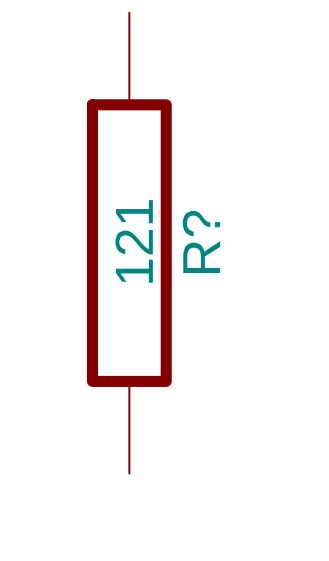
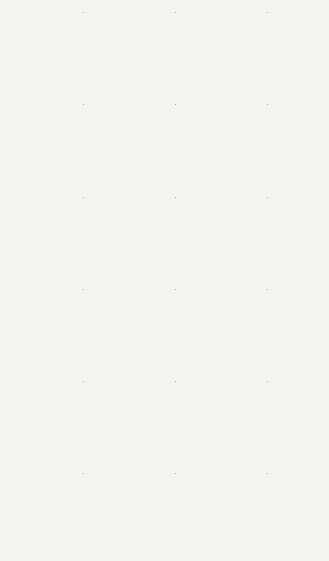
R?: 121 (129, 243) -> none

